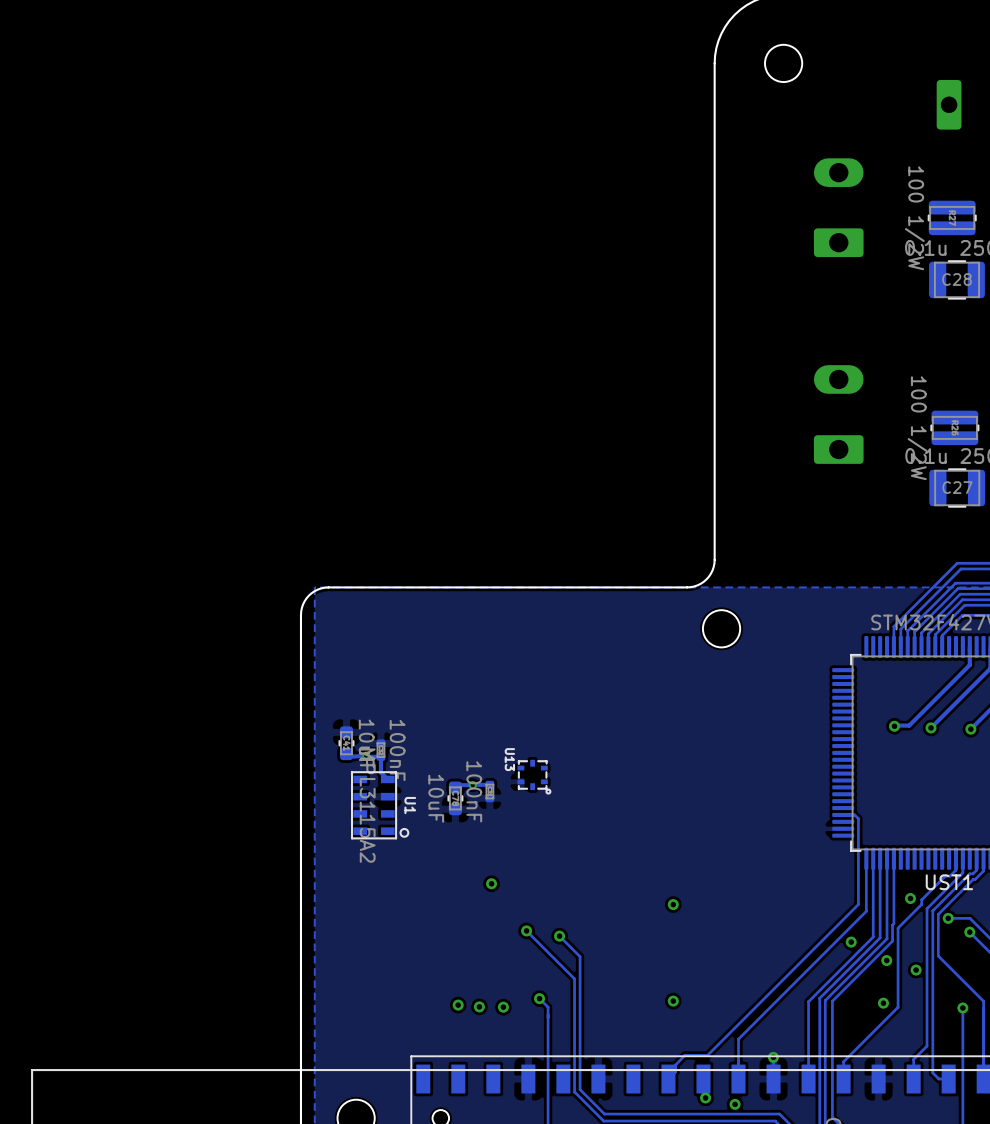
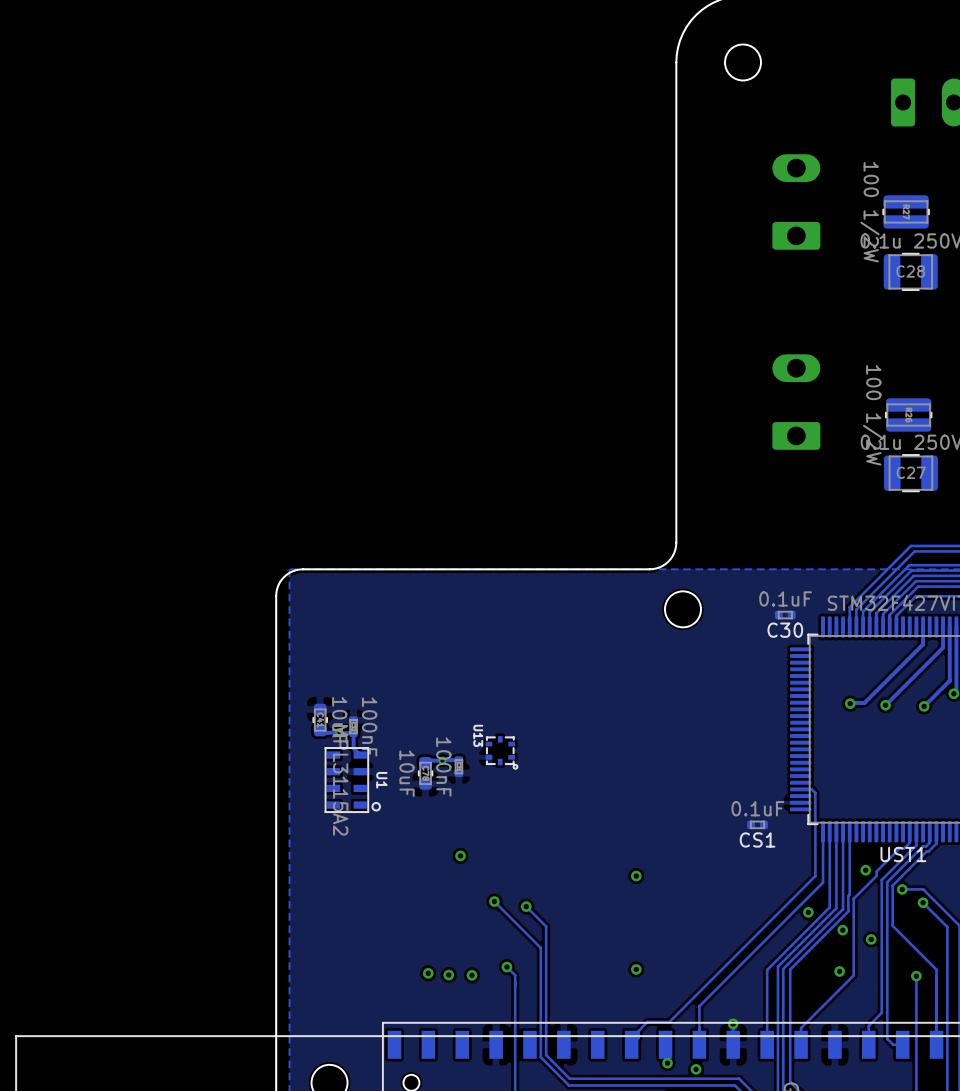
C30: none -> 0.1uF (785, 615)
CS1: none -> 0.1uF (757, 824)

